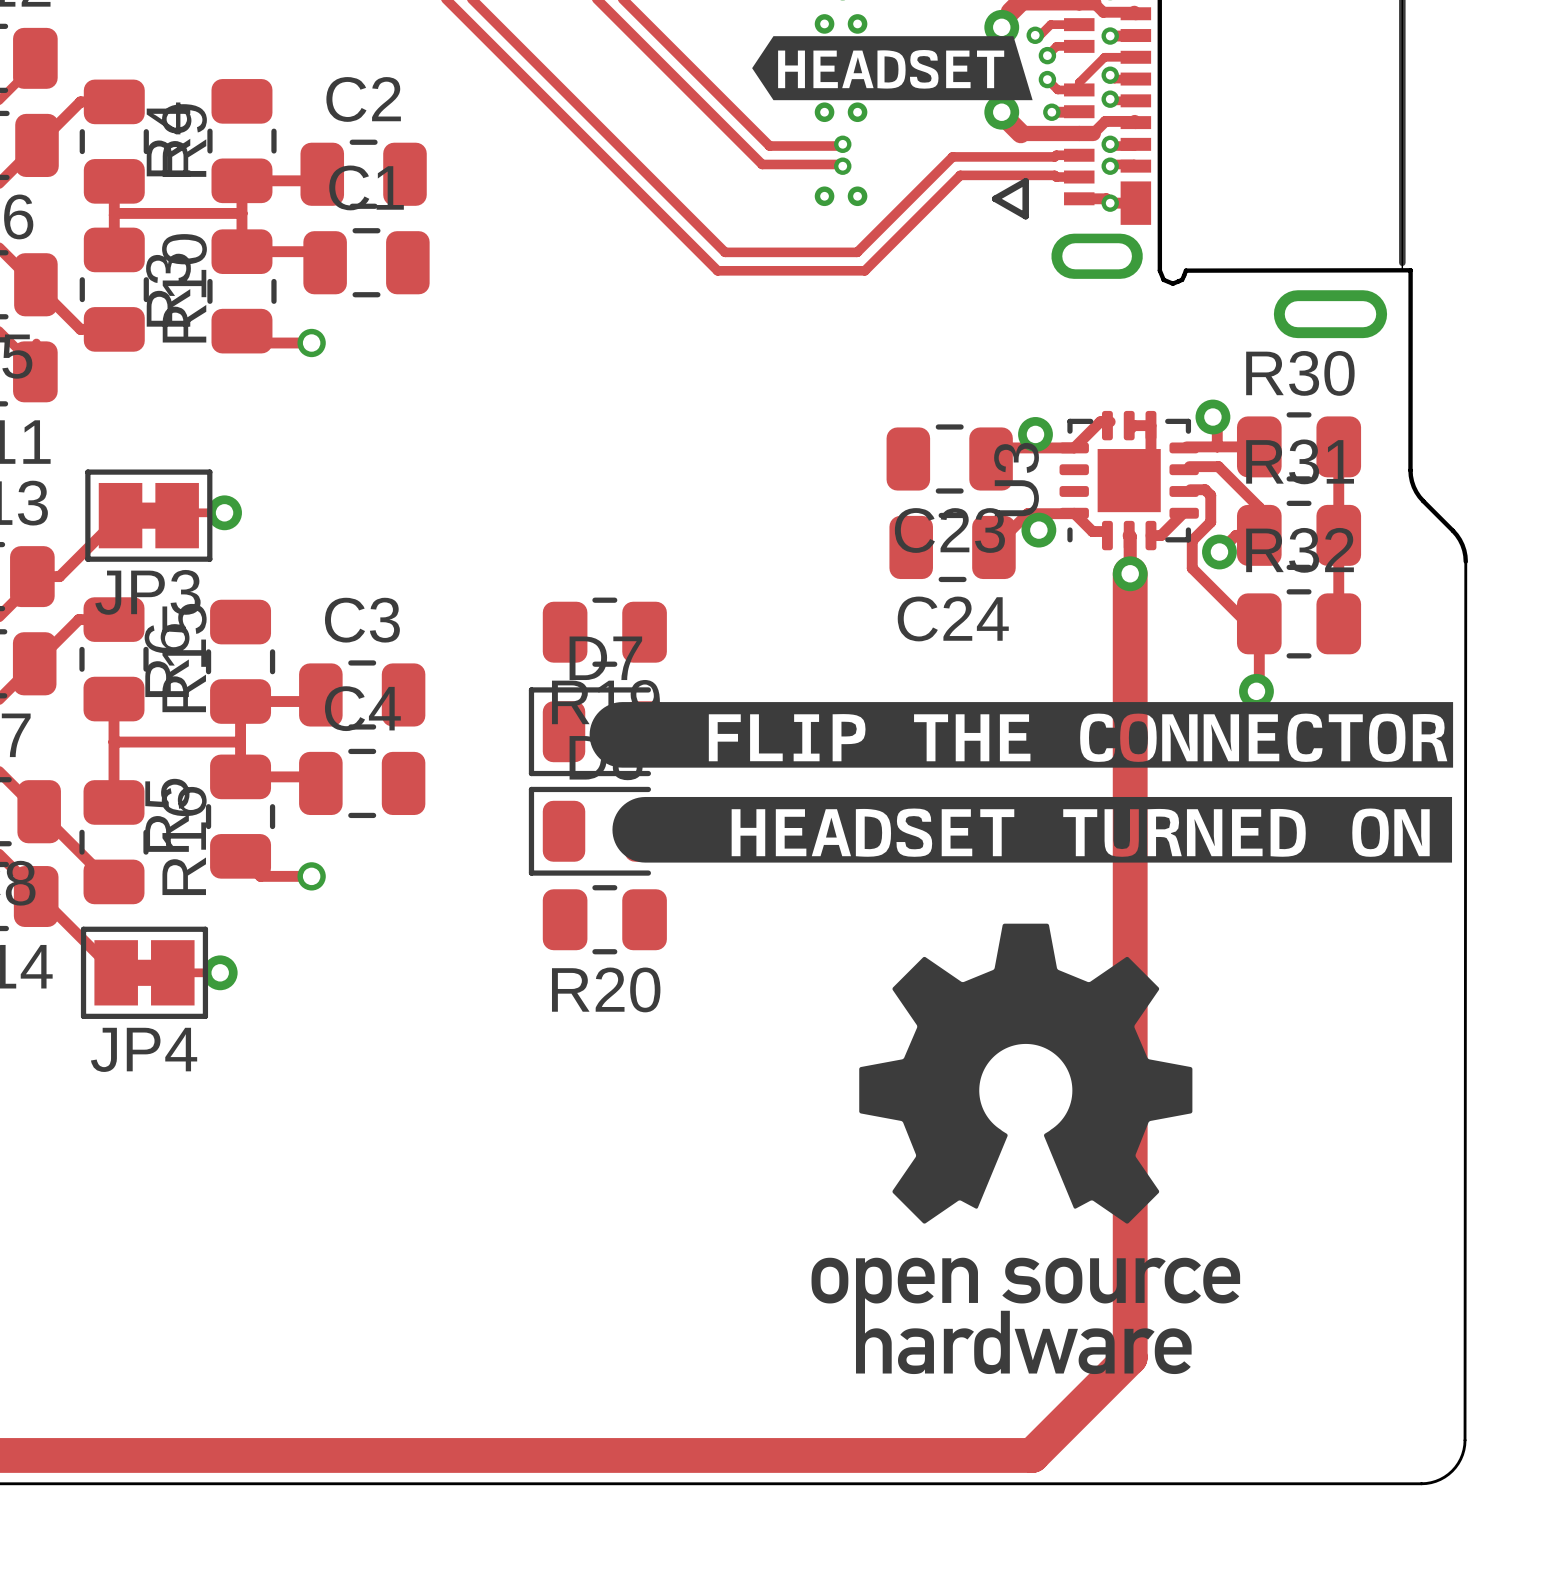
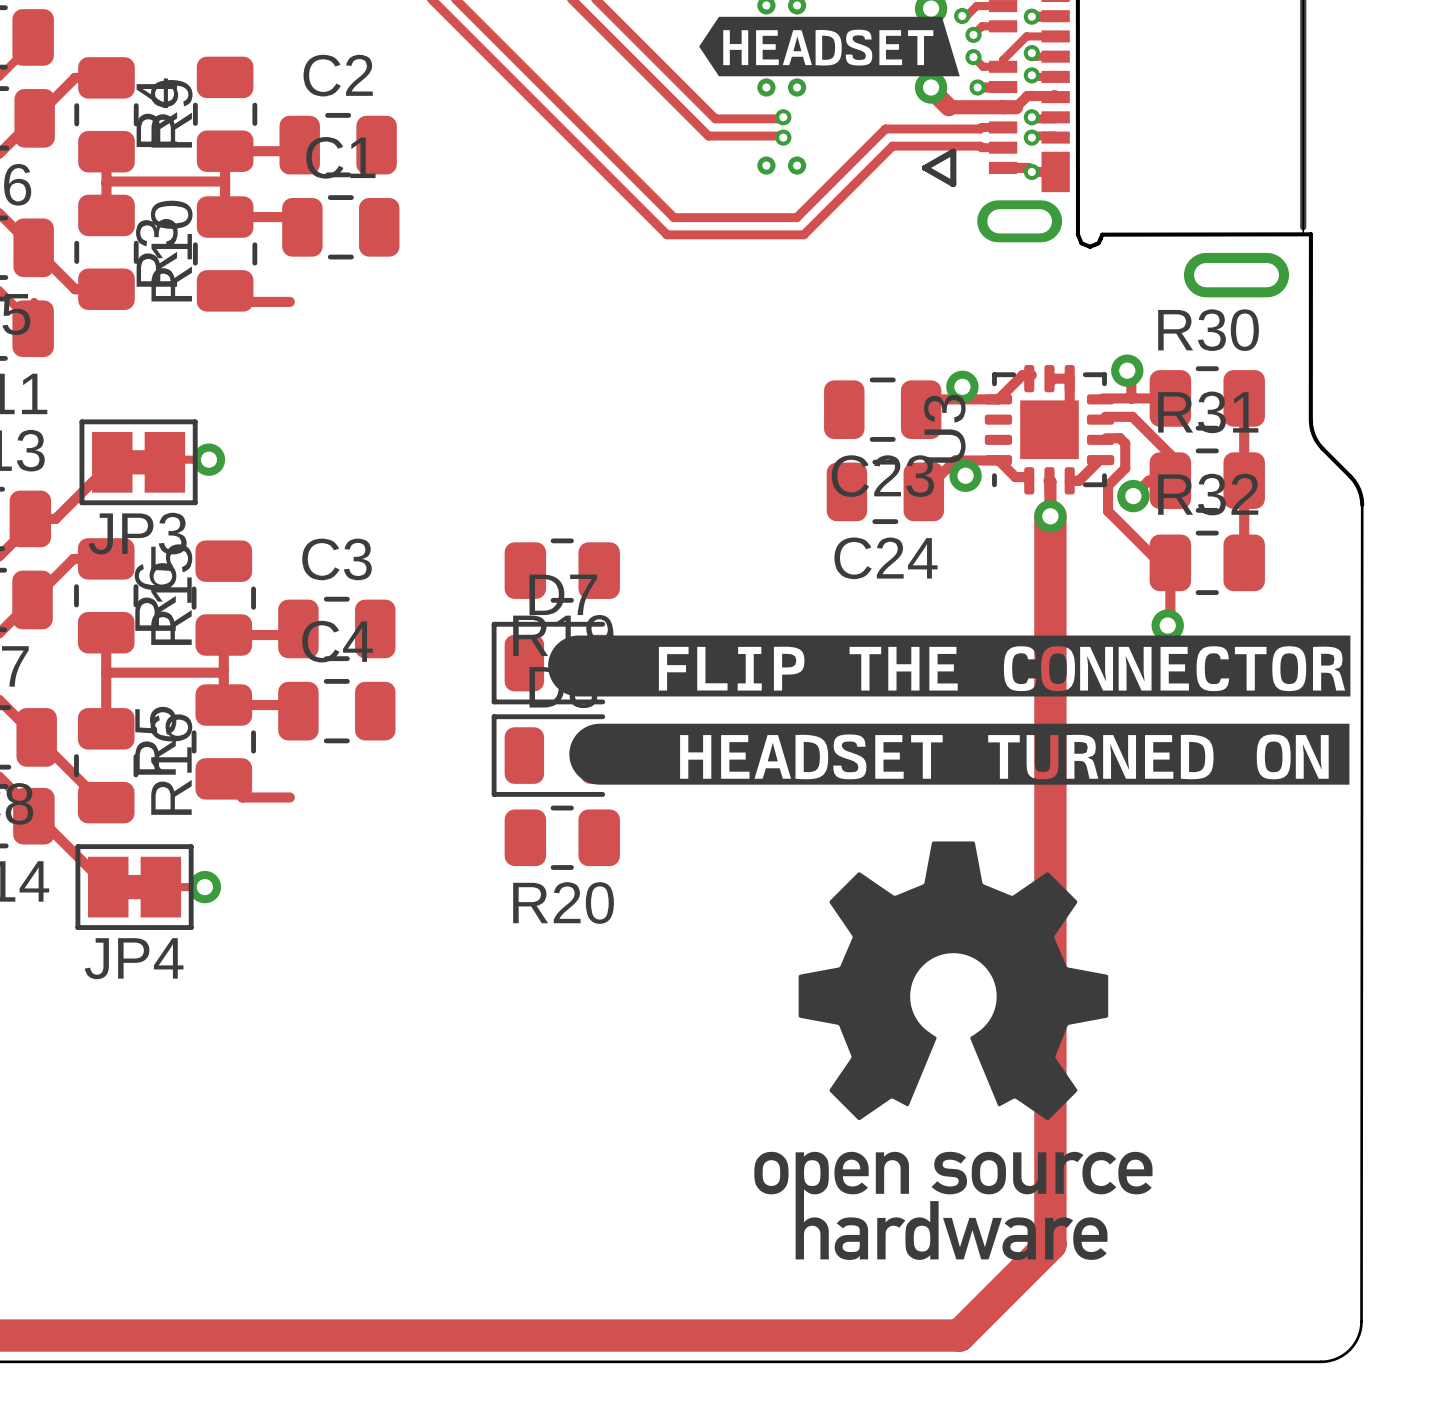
via: (311, 343) -> none
via: (311, 876) -> none

